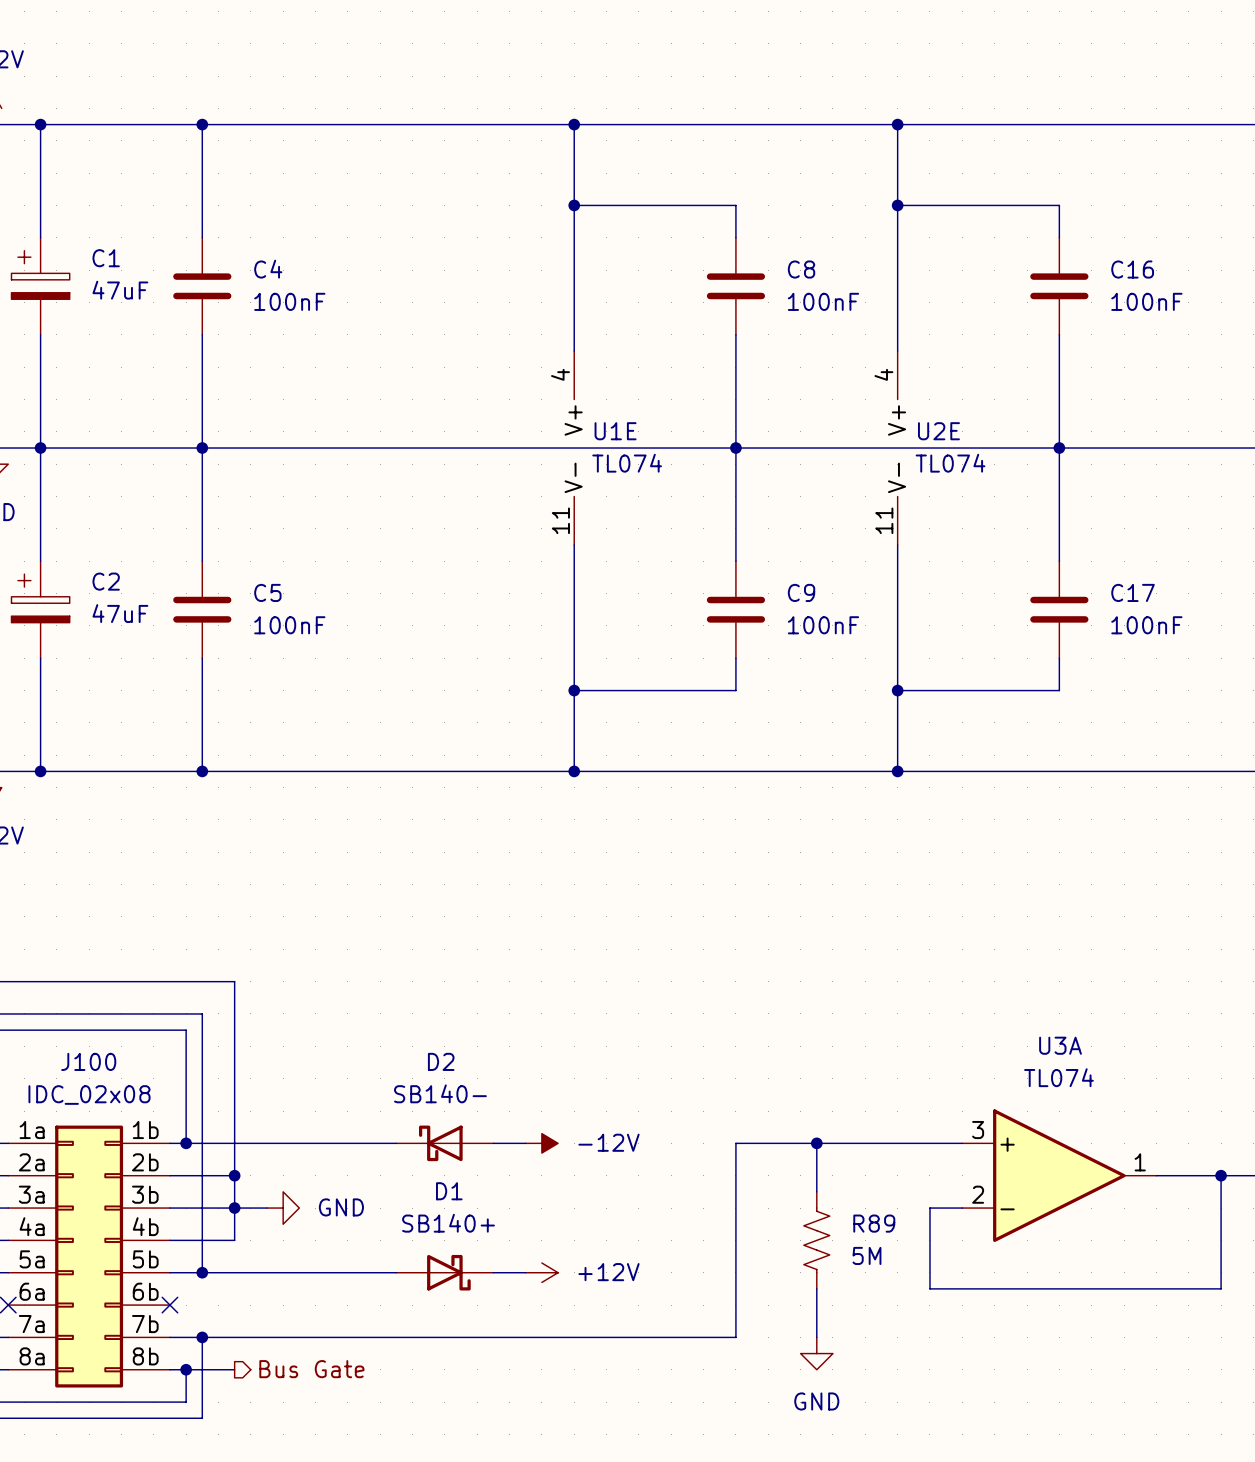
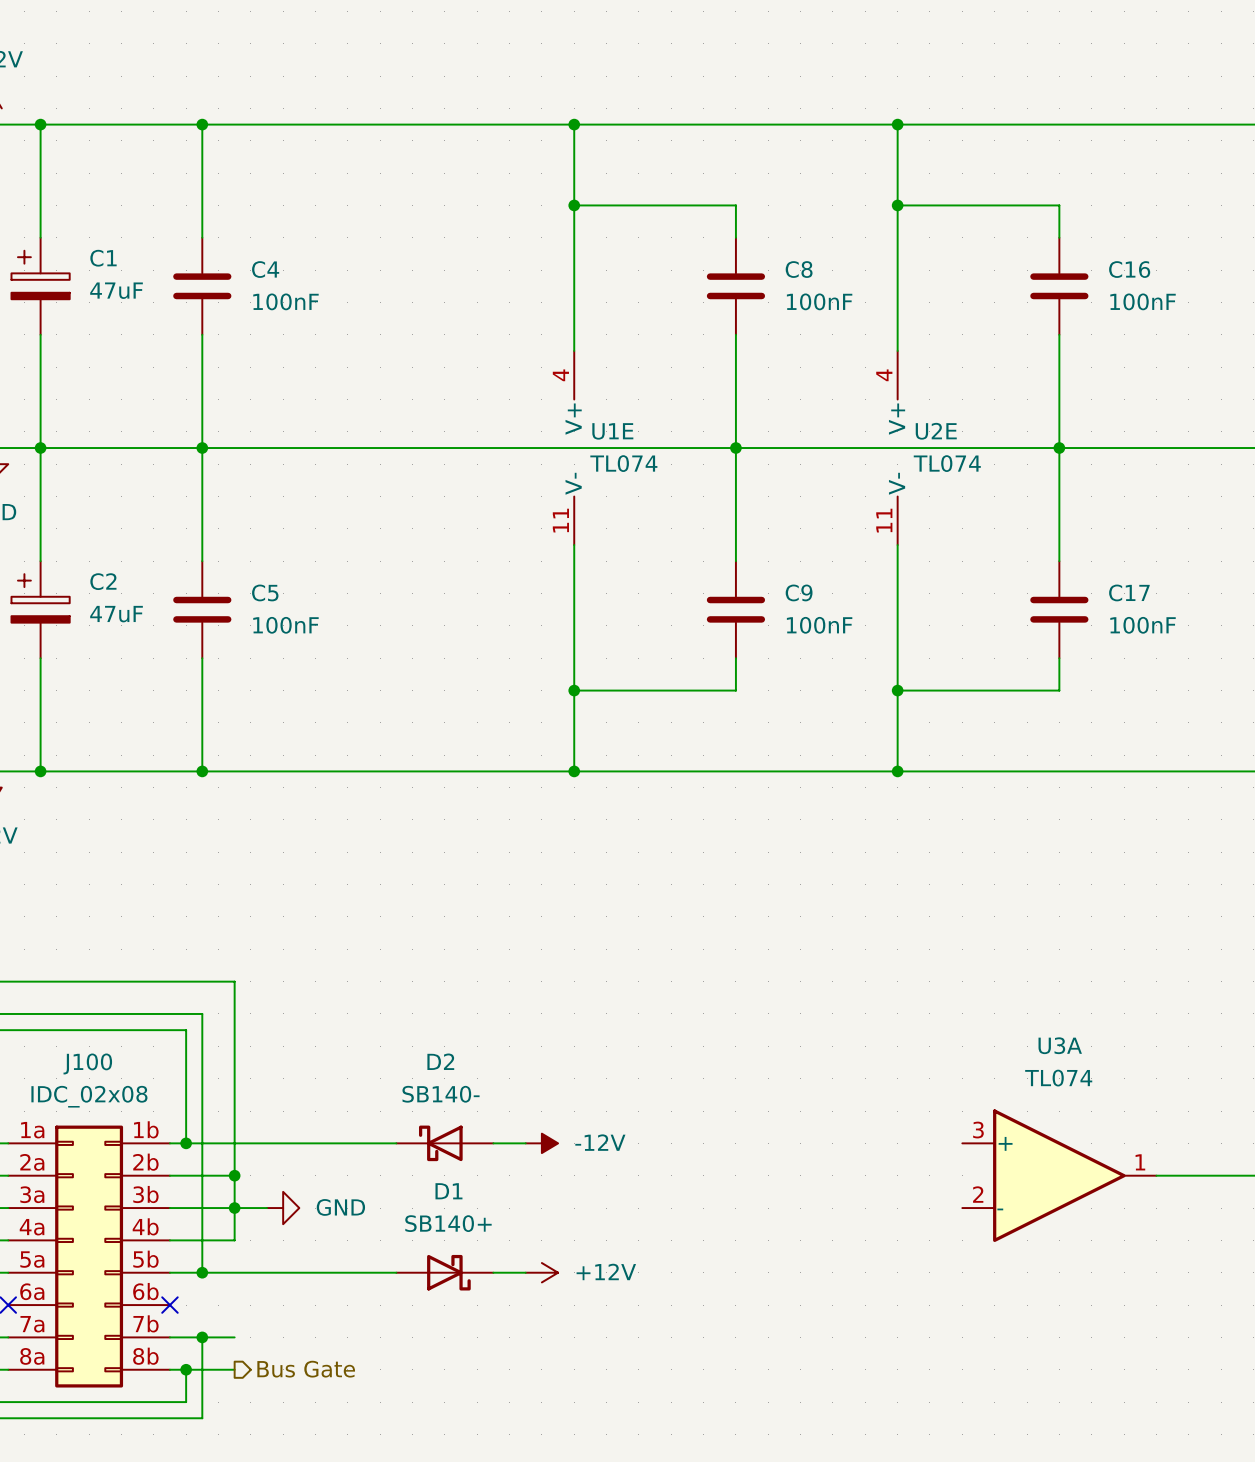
wire: (816, 1143) (816, 1191) -> none
junction: (816, 1143) -> none
wire: (962, 1143) (735, 1143) (735, 1337) (234, 1337) -> none
wire: (1221, 1175) (1221, 1288) (929, 1288) (929, 1208) (962, 1208) -> none
junction: (1221, 1175) -> none
R89: 5M (816, 1240) -> none
wire: (816, 1288) (816, 1337) -> none
power symbol: GND (816, 1353) -> none

